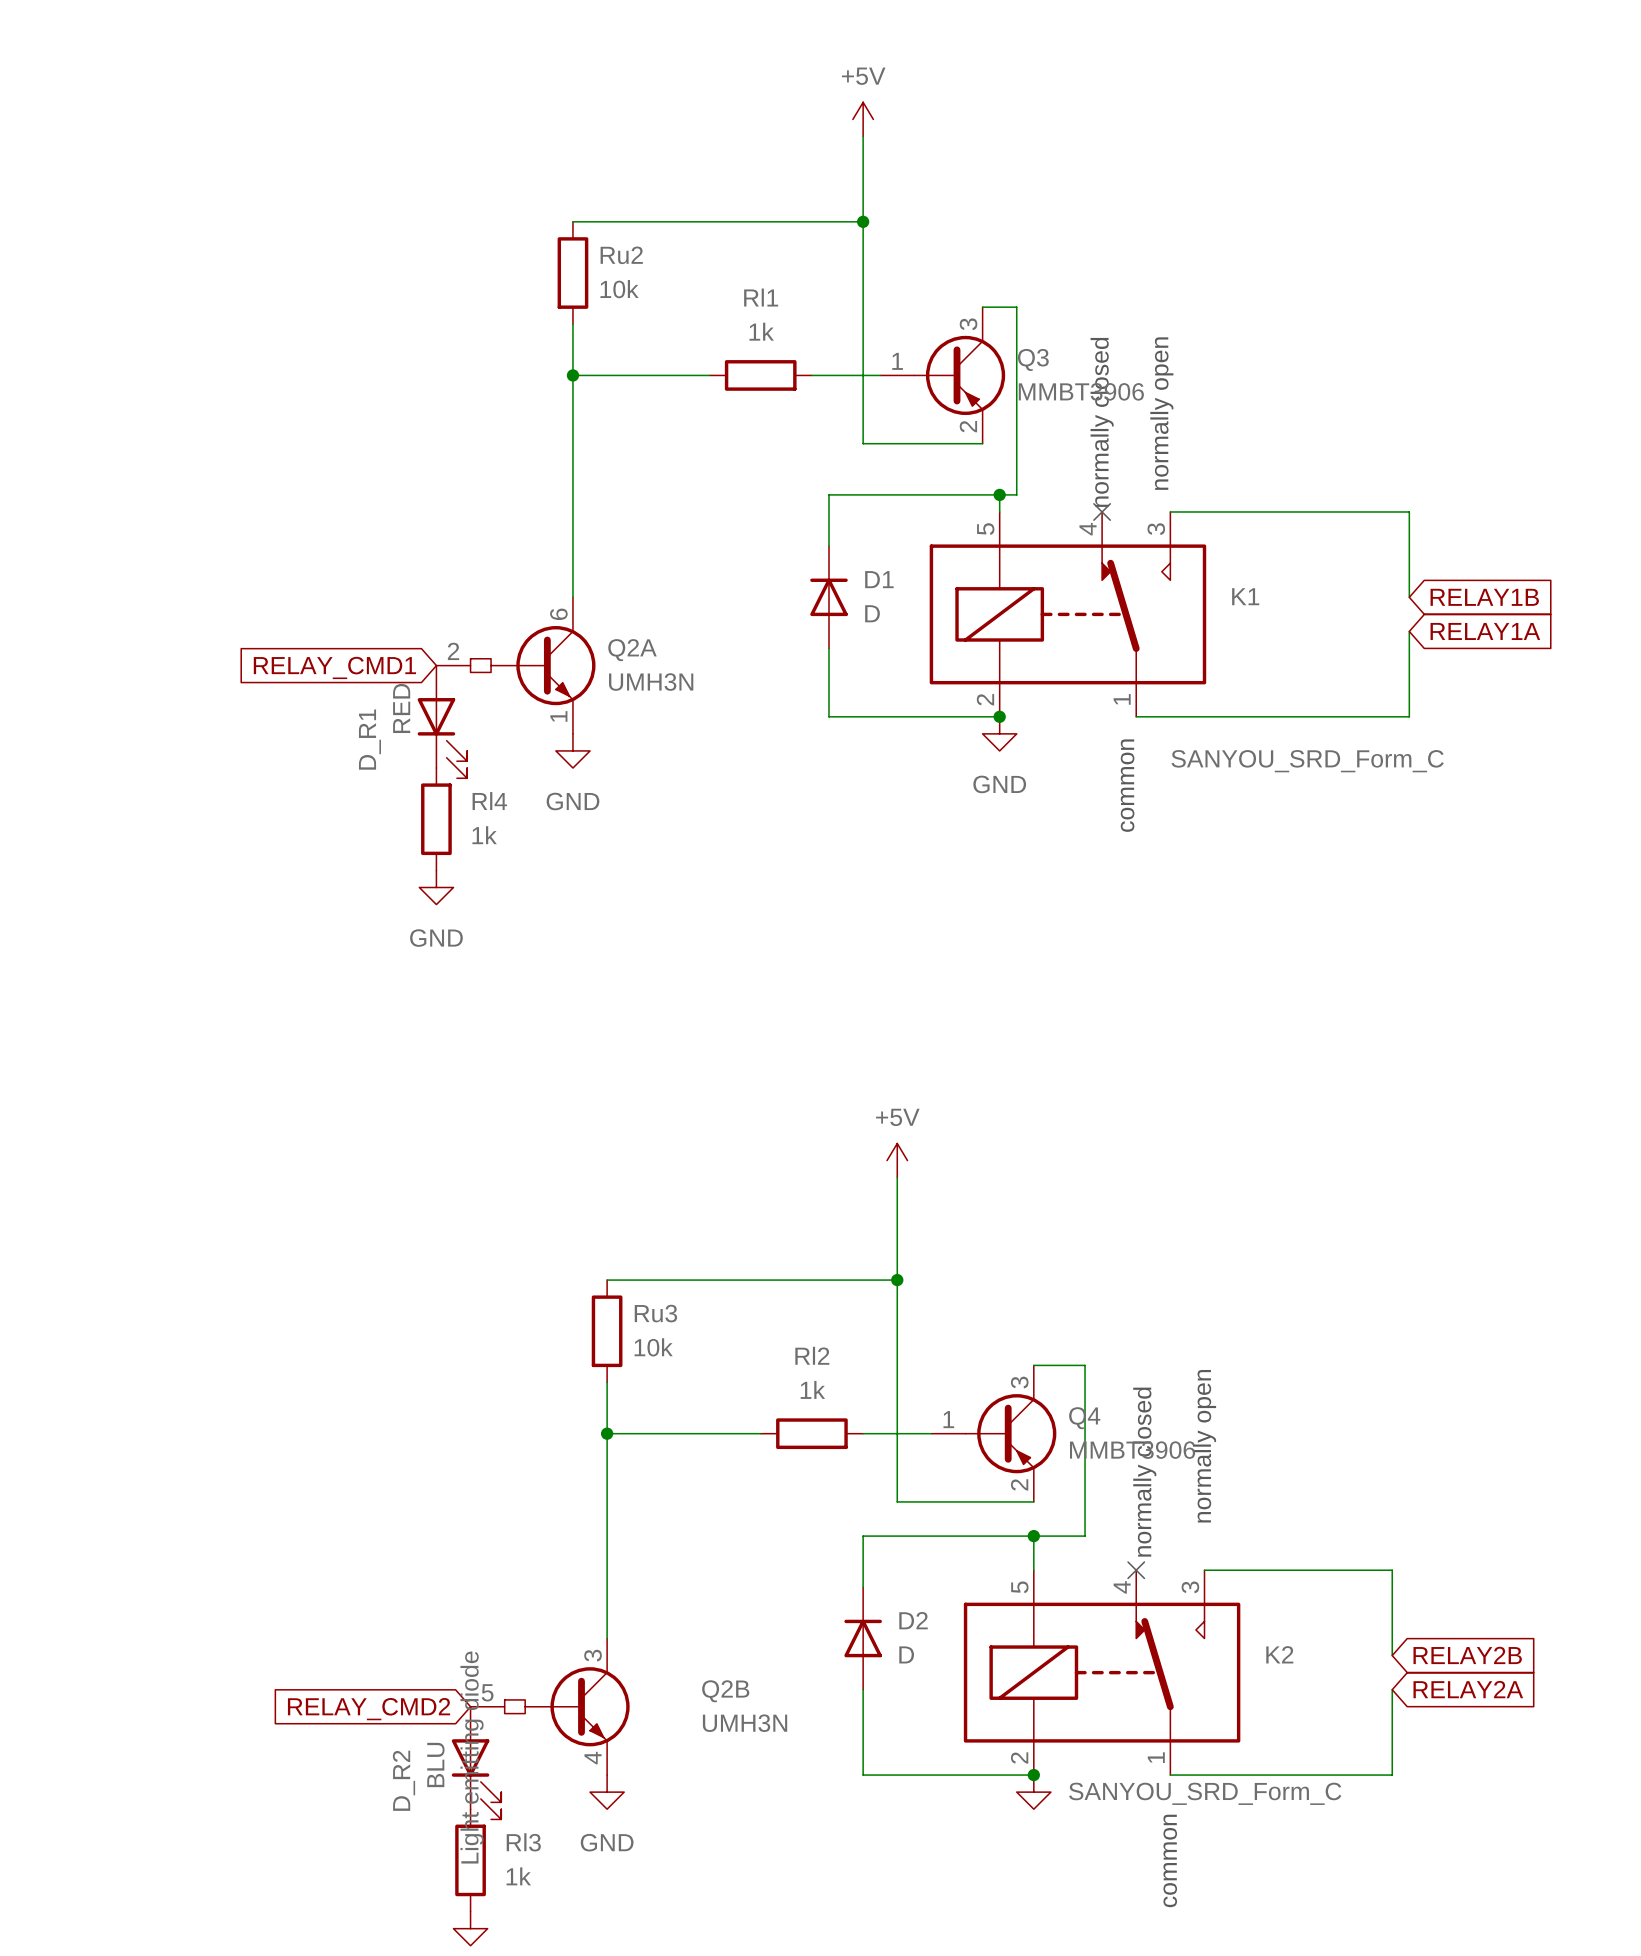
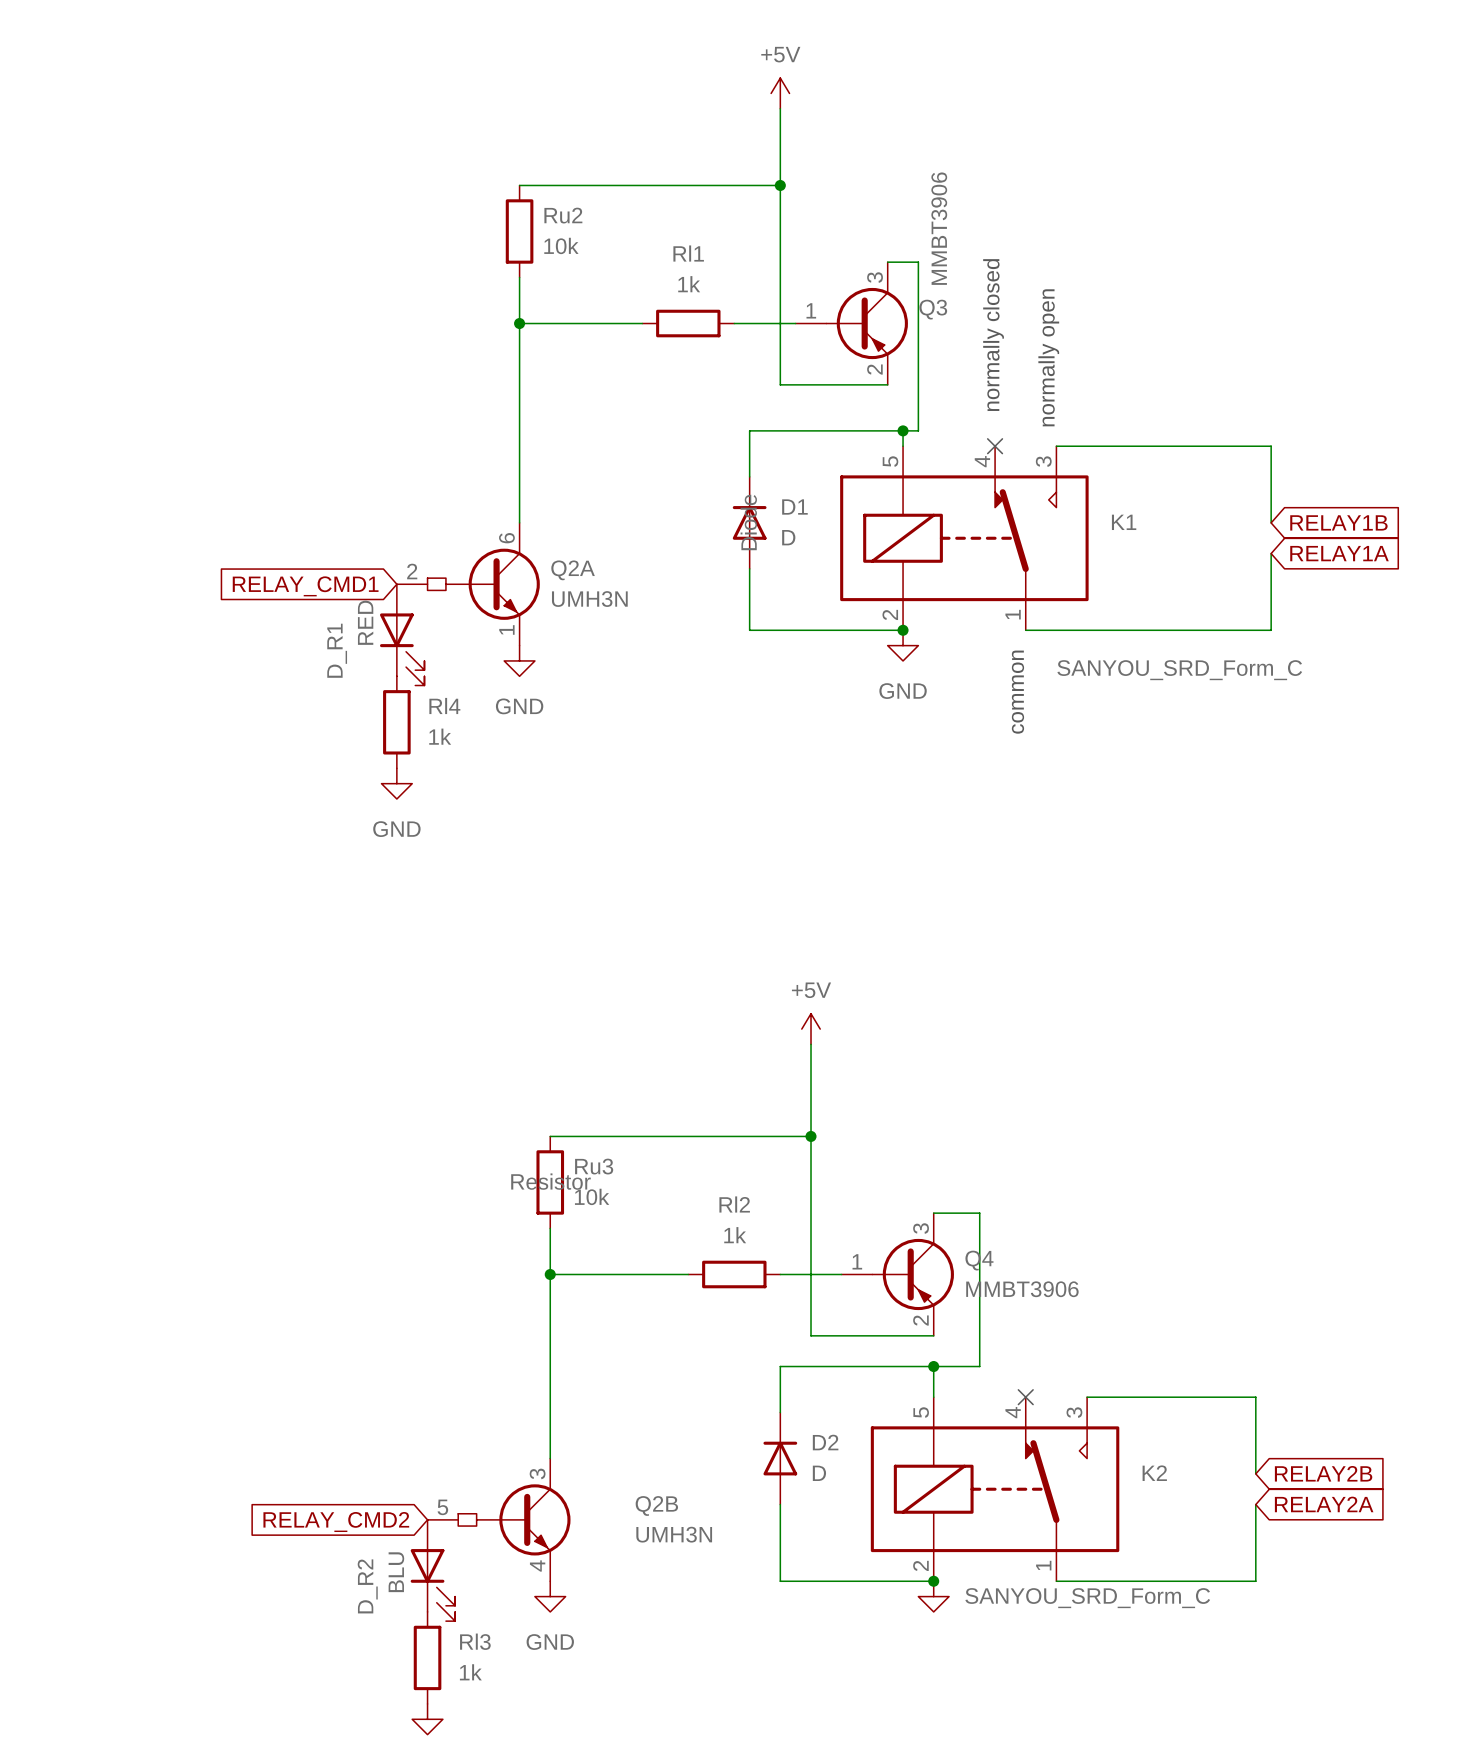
Q3 value rotation: 0° (1081, 391) -> 90° counterclockwise (939, 228)
text position: normally closed (1102, 422) -> normally closed (993, 335)
D1 text: none -> Diode (748, 522)
Ru3 text: none -> Resistor (550, 1181)
text: normally open (1204, 1446) -> none
text: normally closed (1144, 1472) -> none
D_R2 text: Light emitting diode (472, 1757) -> none
text: common (1170, 1860) -> none

